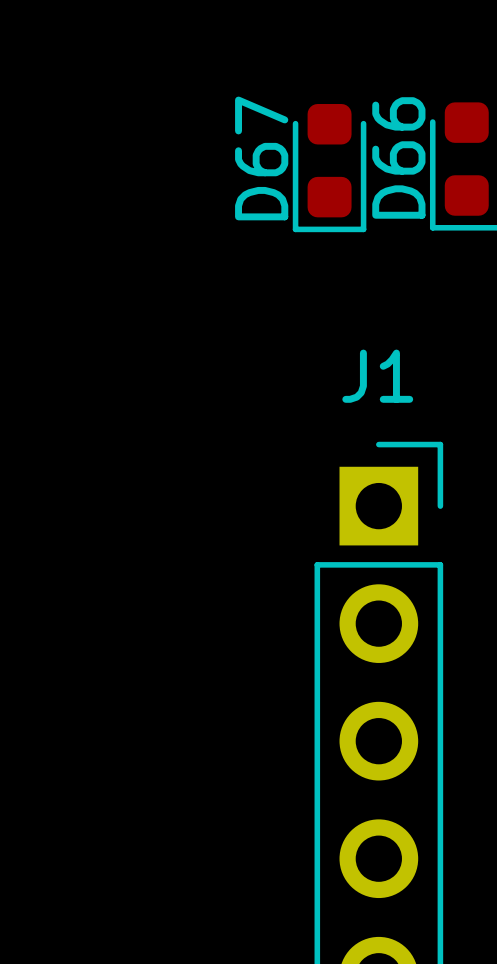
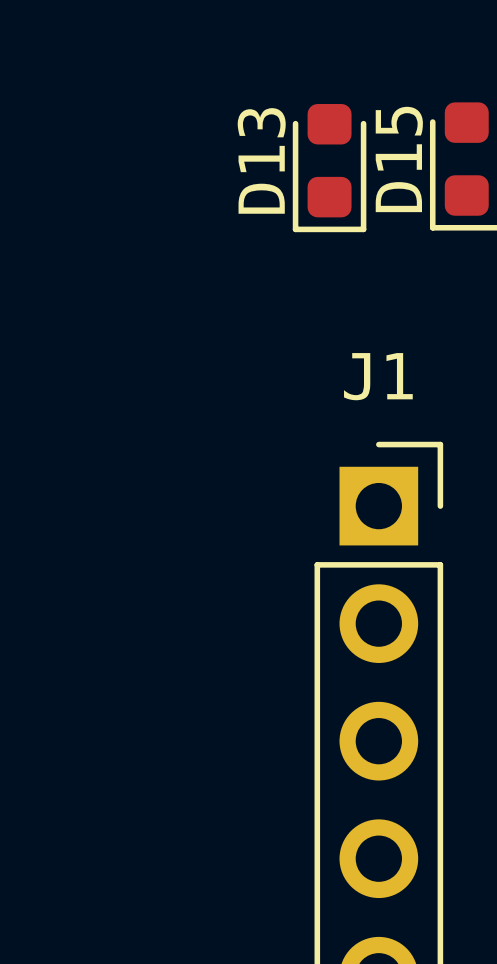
D66 name: D66 (398, 157) -> D15 (399, 159)
D67 name: D67 (261, 158) -> D13 (261, 160)

